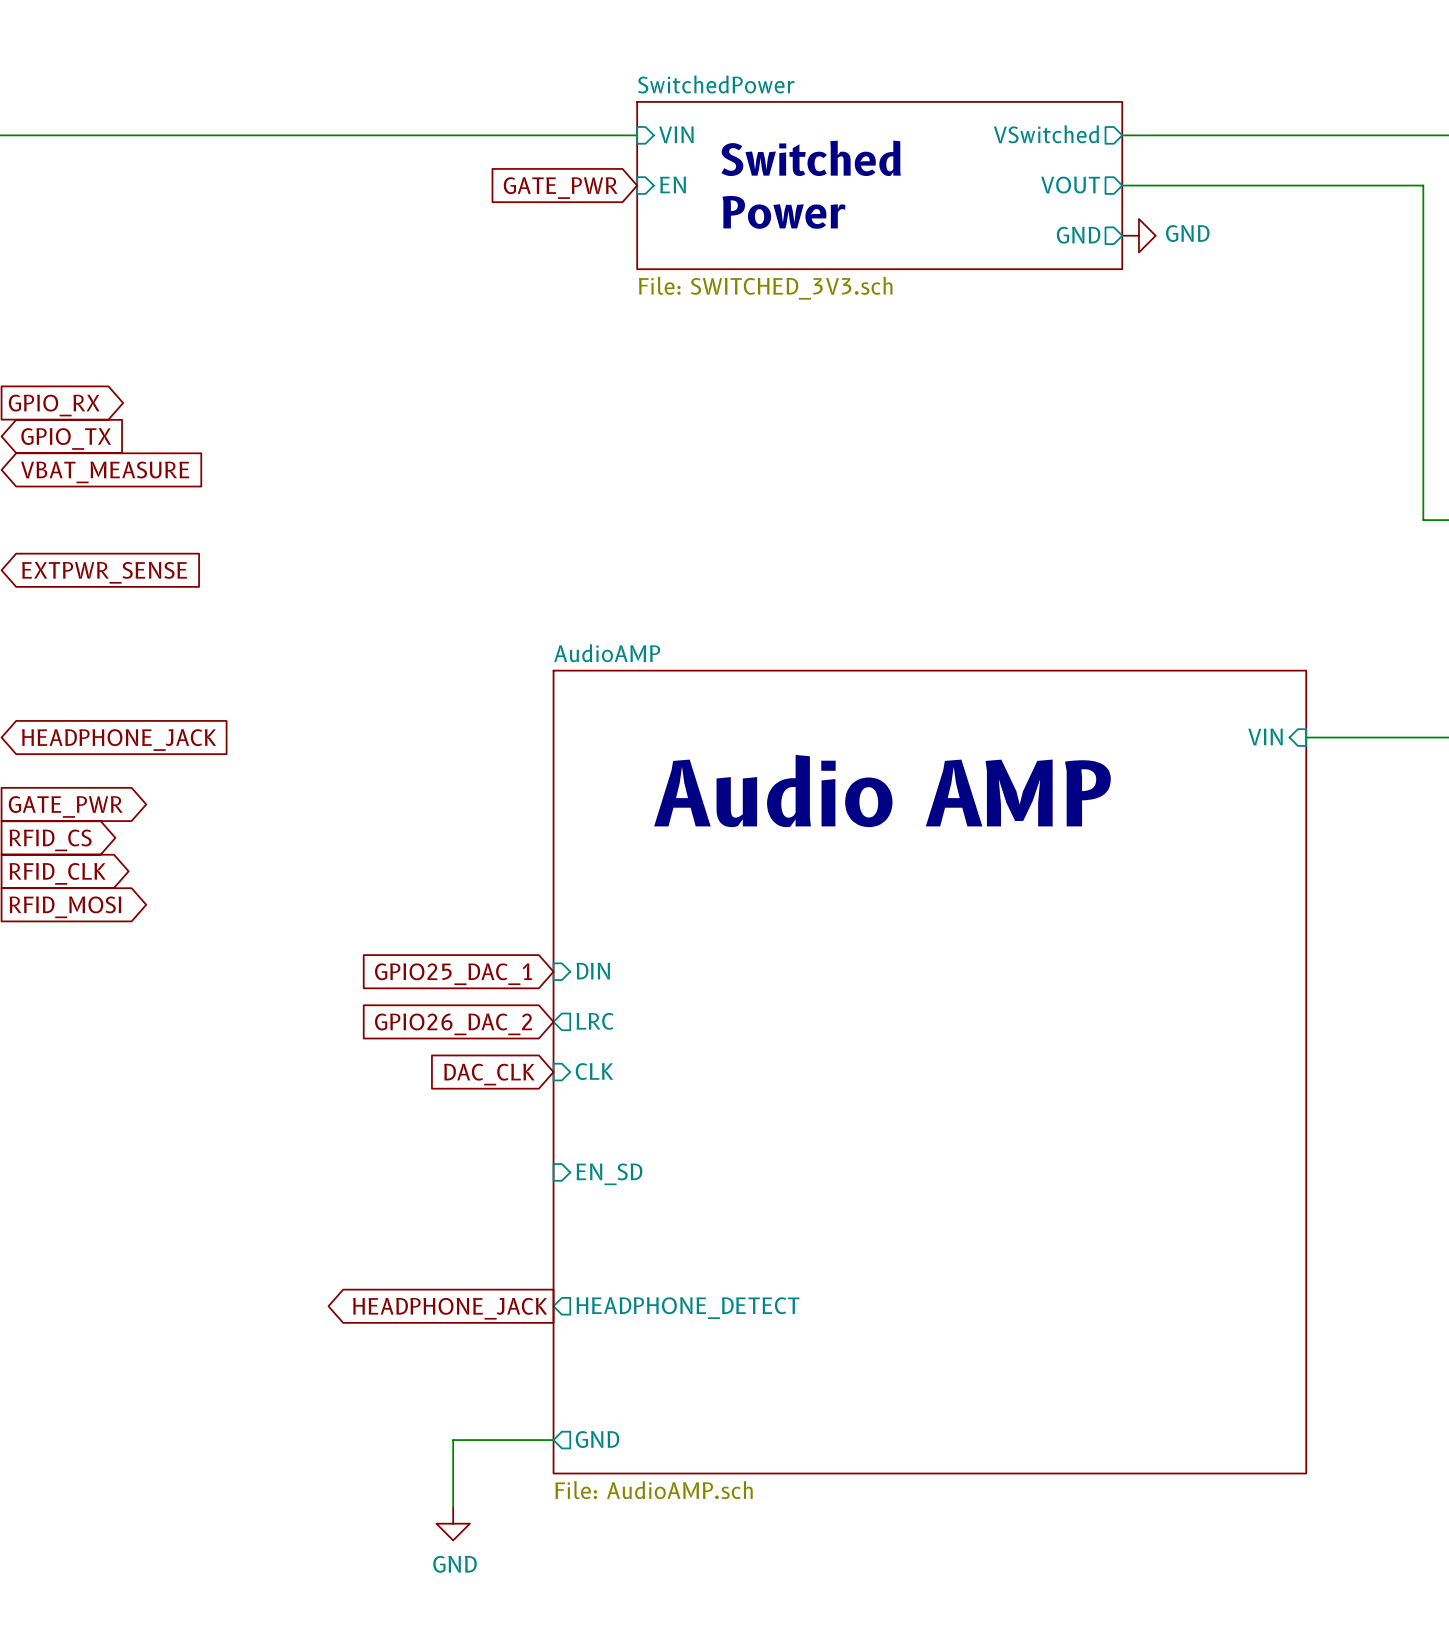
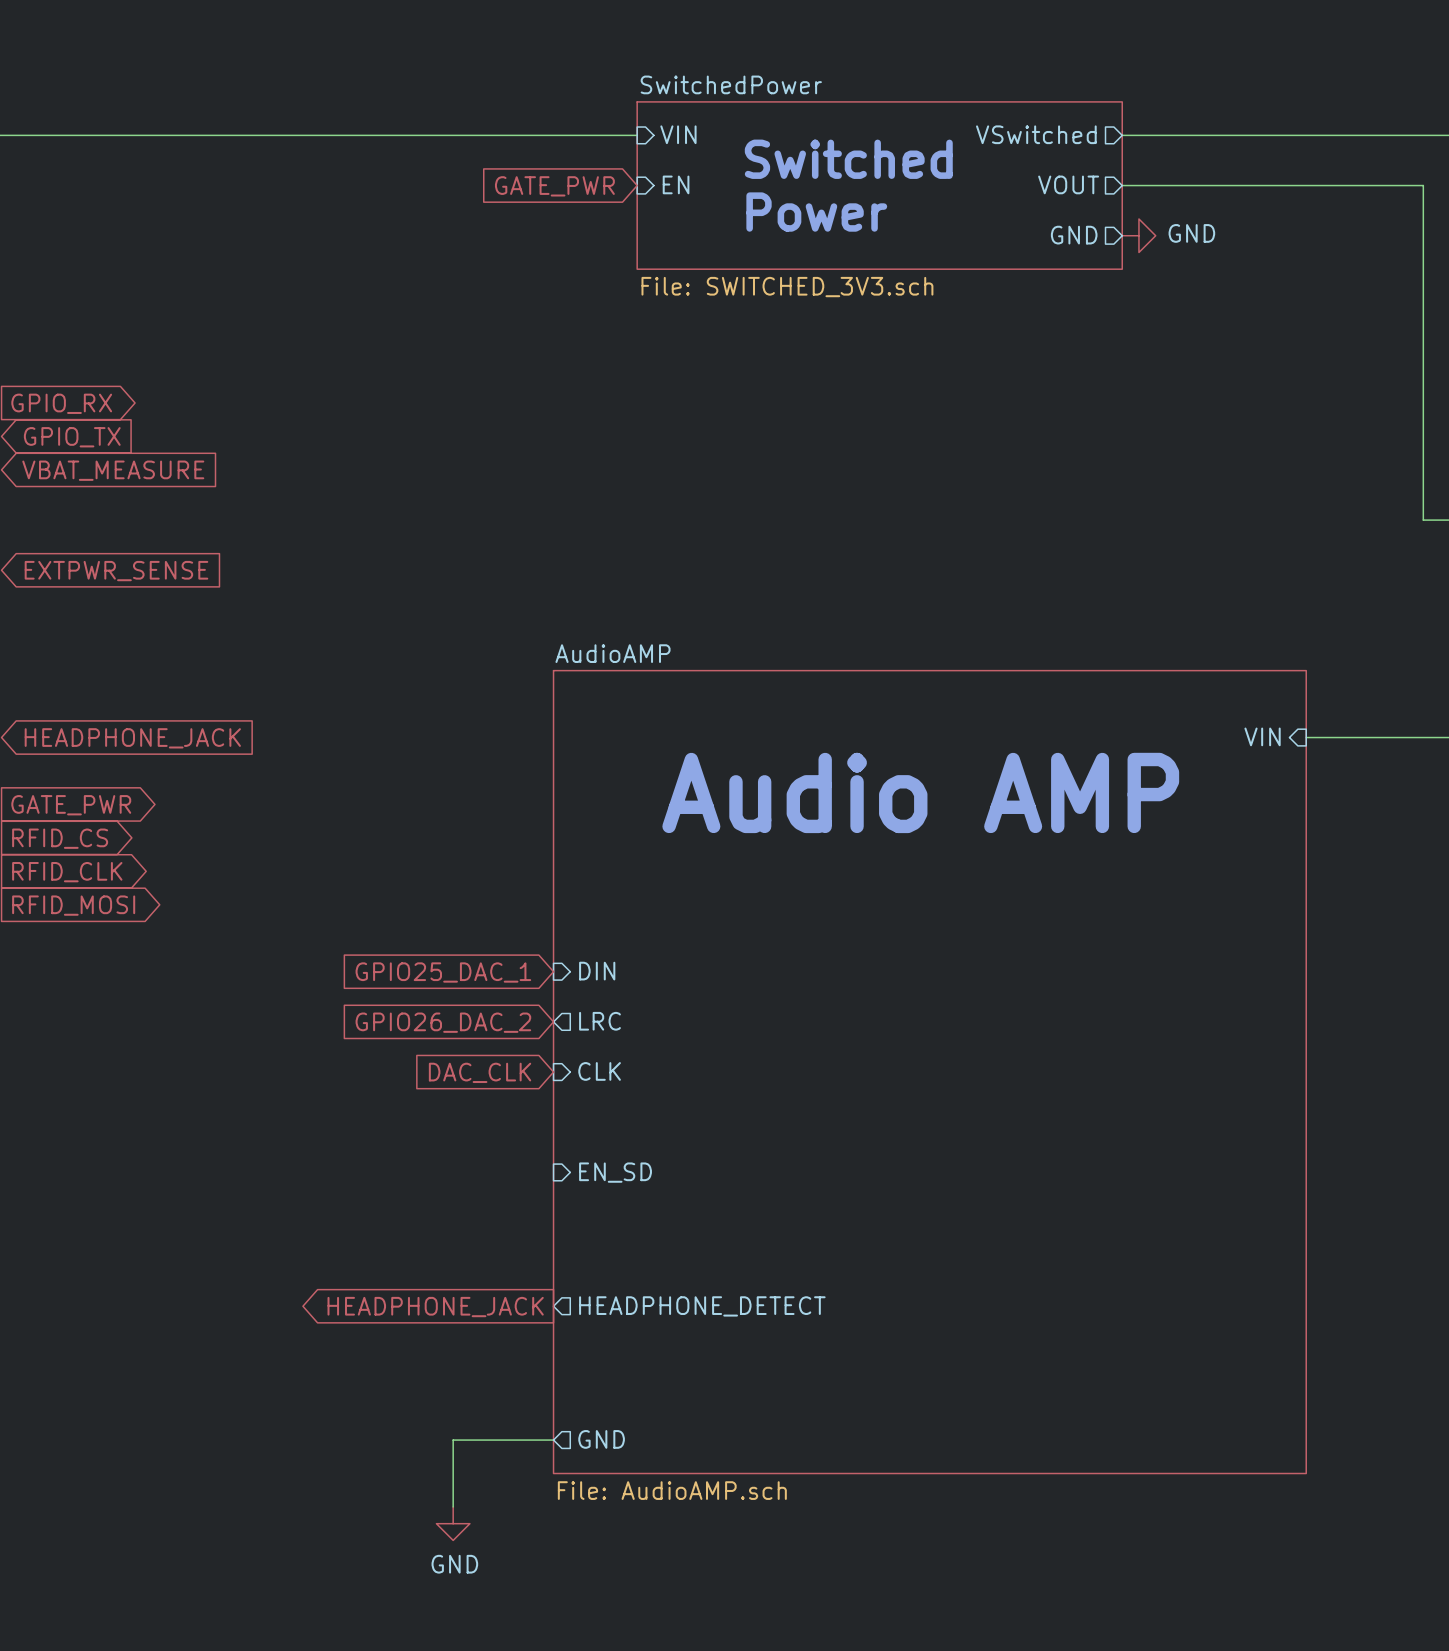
text position: Switched (811, 158) -> Switched (848, 159)
text position: Power (783, 212) -> Power (816, 212)

